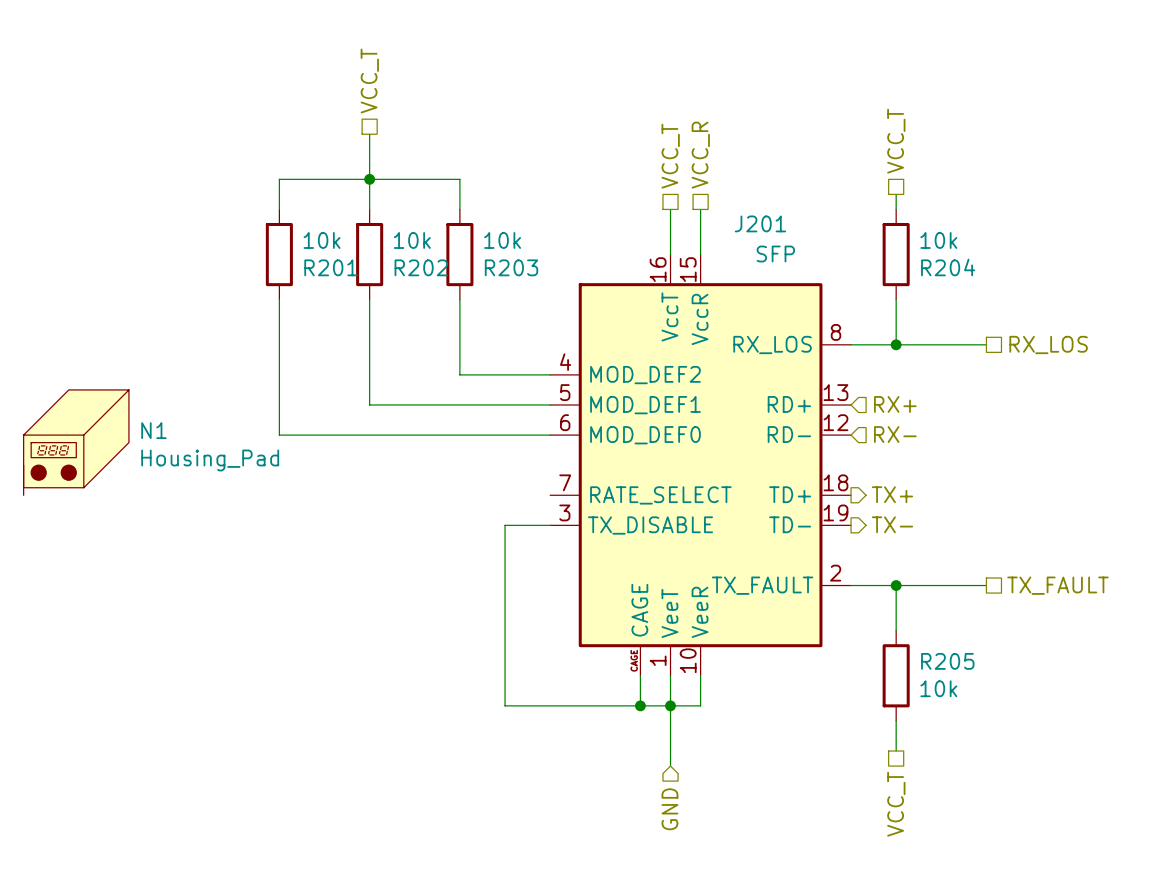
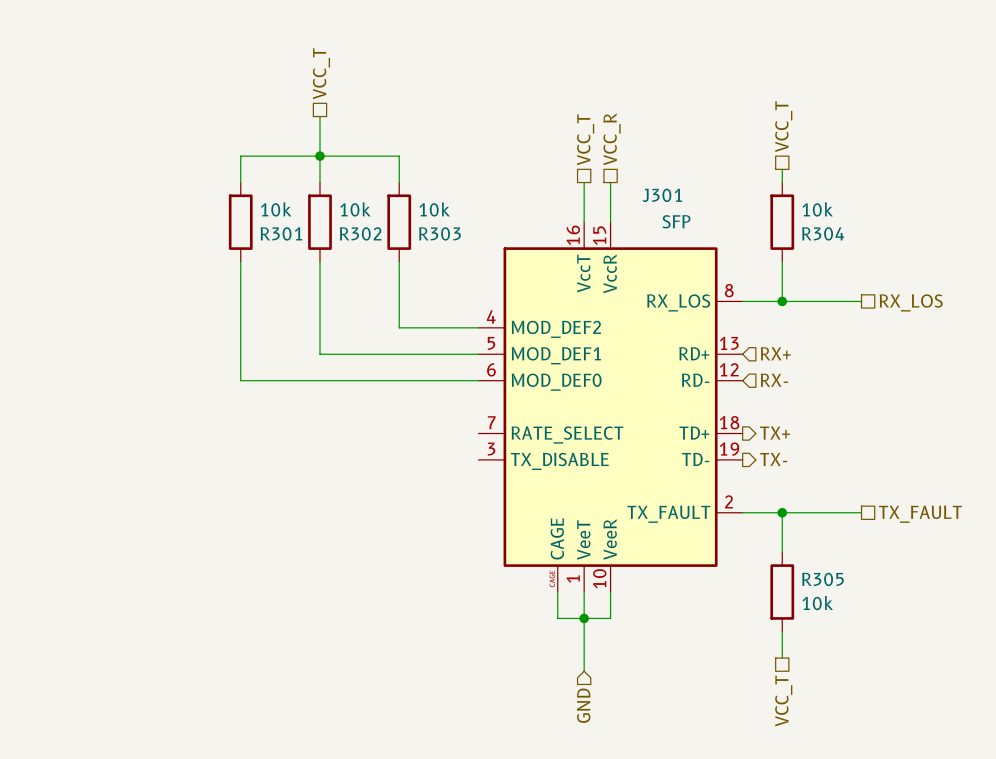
J201 name: J201 (760, 223) -> J301 (662, 195)
R201 name: R201 (331, 267) -> R301 (281, 233)
R202 name: R202 (421, 267) -> R302 (360, 233)
R203 name: R203 (511, 267) -> R303 (439, 233)
R204 name: R204 (948, 267) -> R304 (823, 233)
N1: Housing_Pad (76, 442) -> none
wire: (550, 525) (505, 525) (505, 705) (640, 705) -> none
R205 name: R205 (947, 661) -> R305 (822, 579)
junction: (640, 705) -> none

